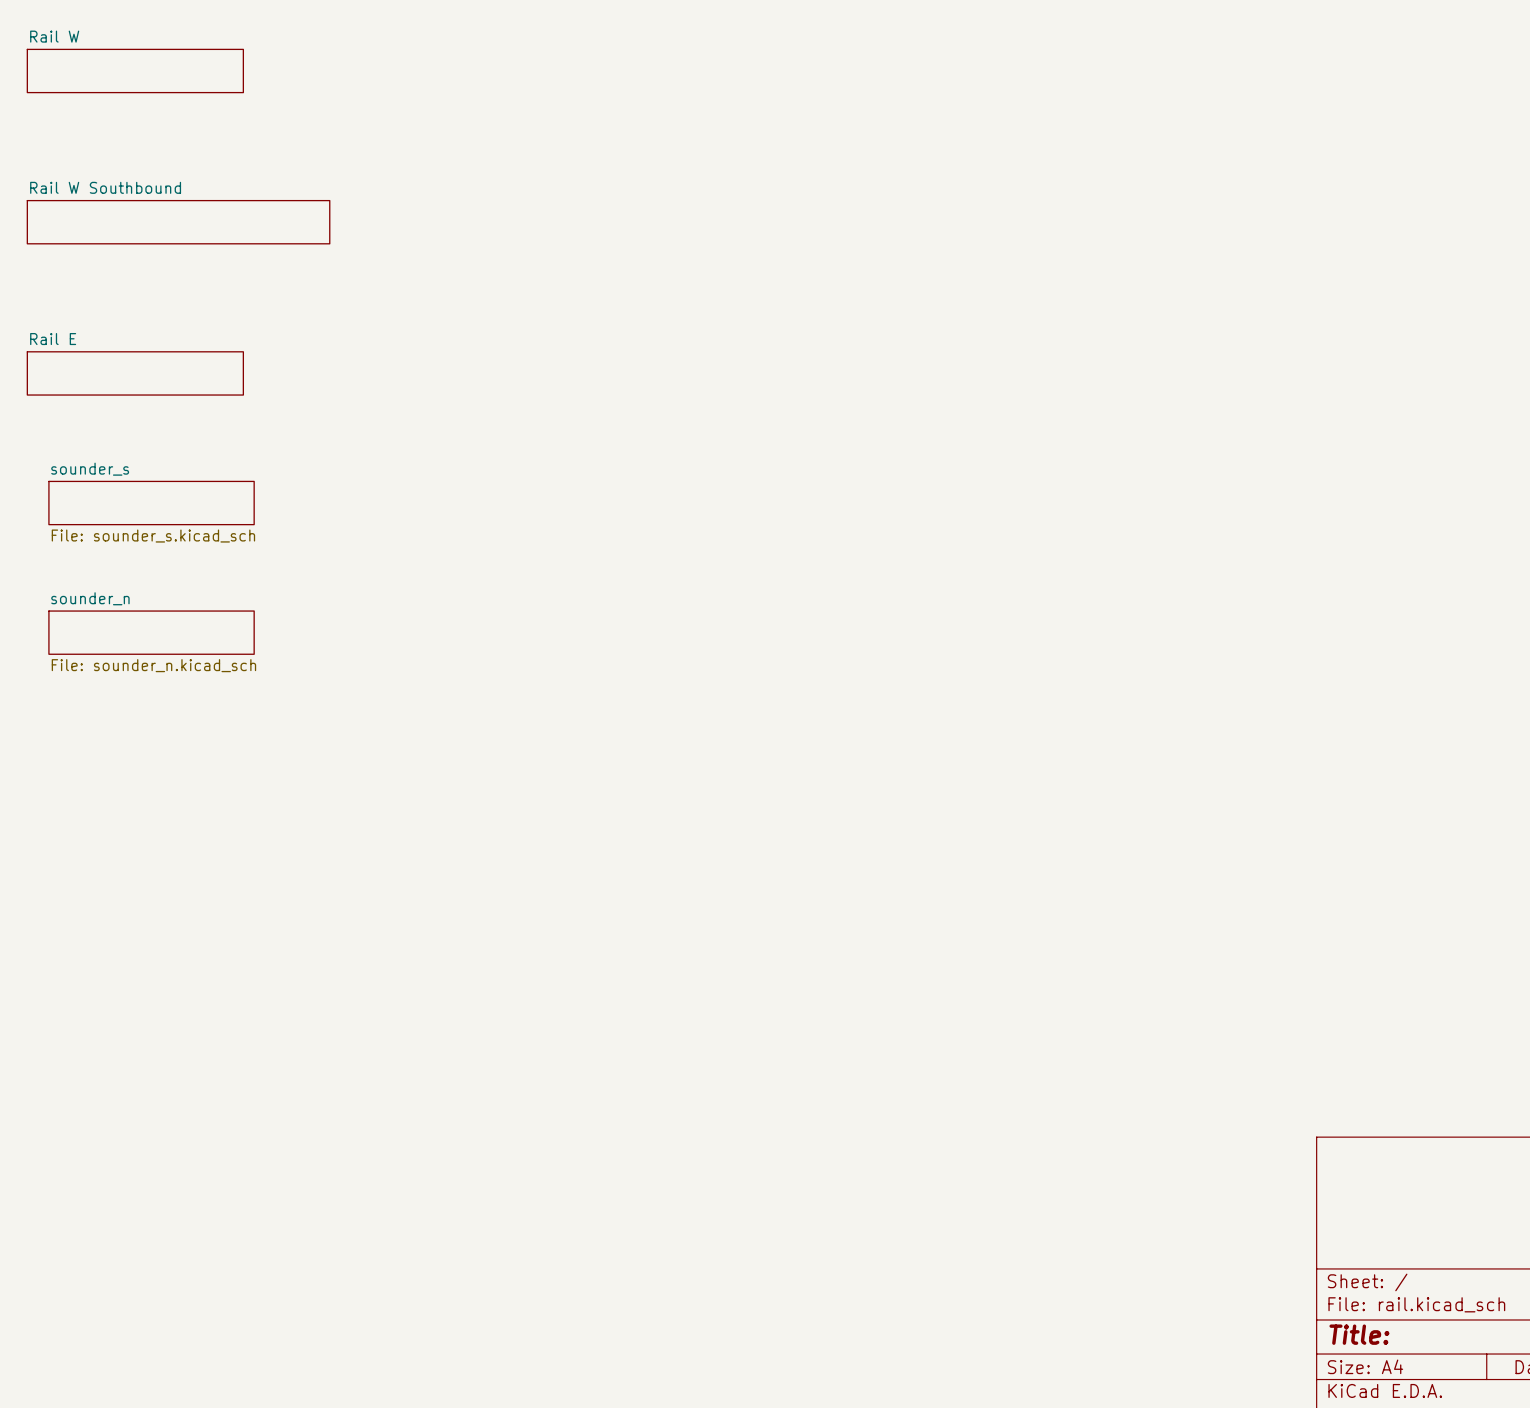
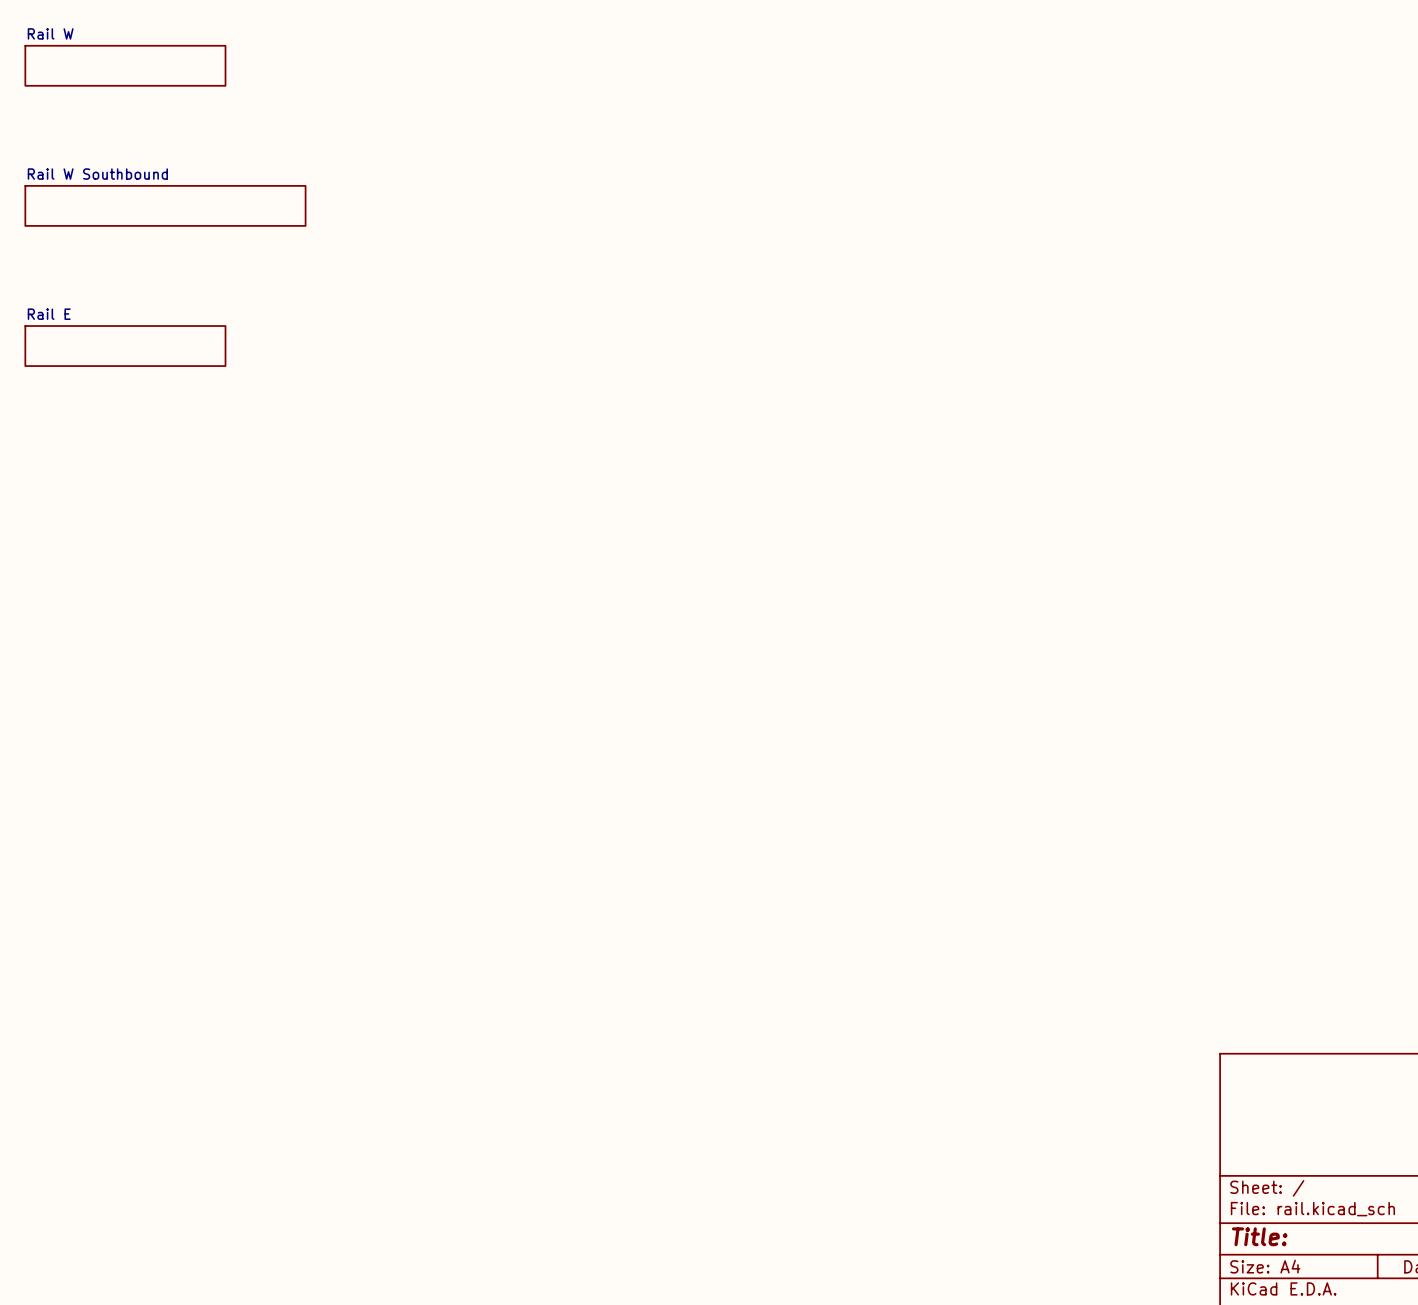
sheet sounder_s: File: sounder_s.kicad_sch (151, 503) -> none
sheet sounder_n: File: sounder_n.kicad_sch (151, 632) -> none

